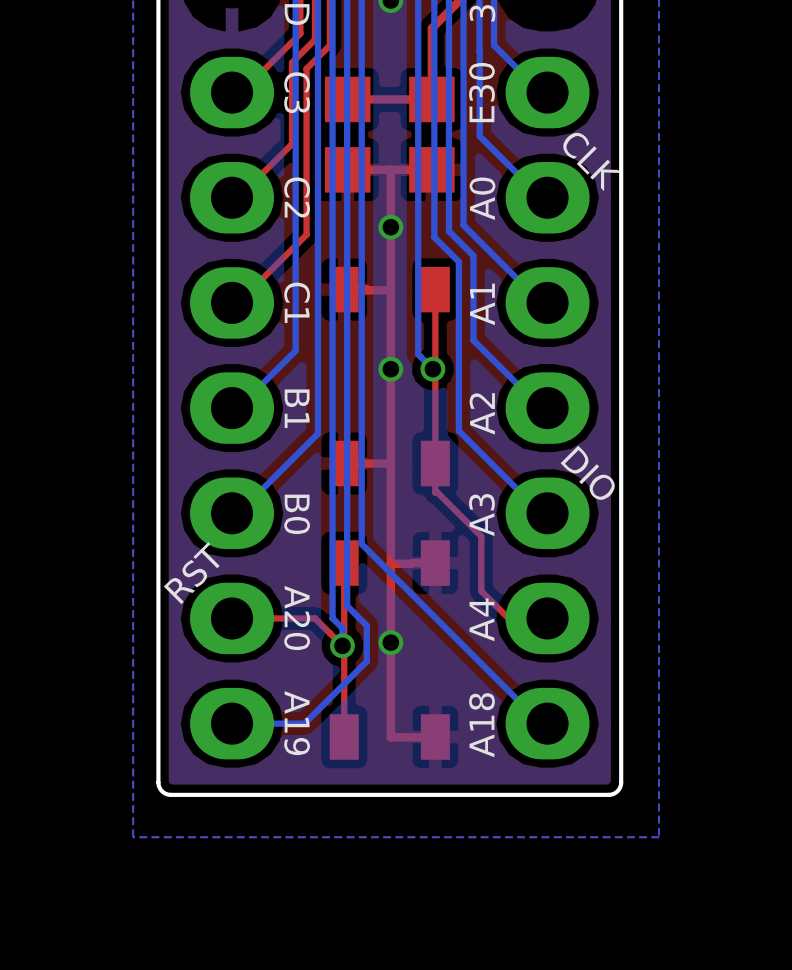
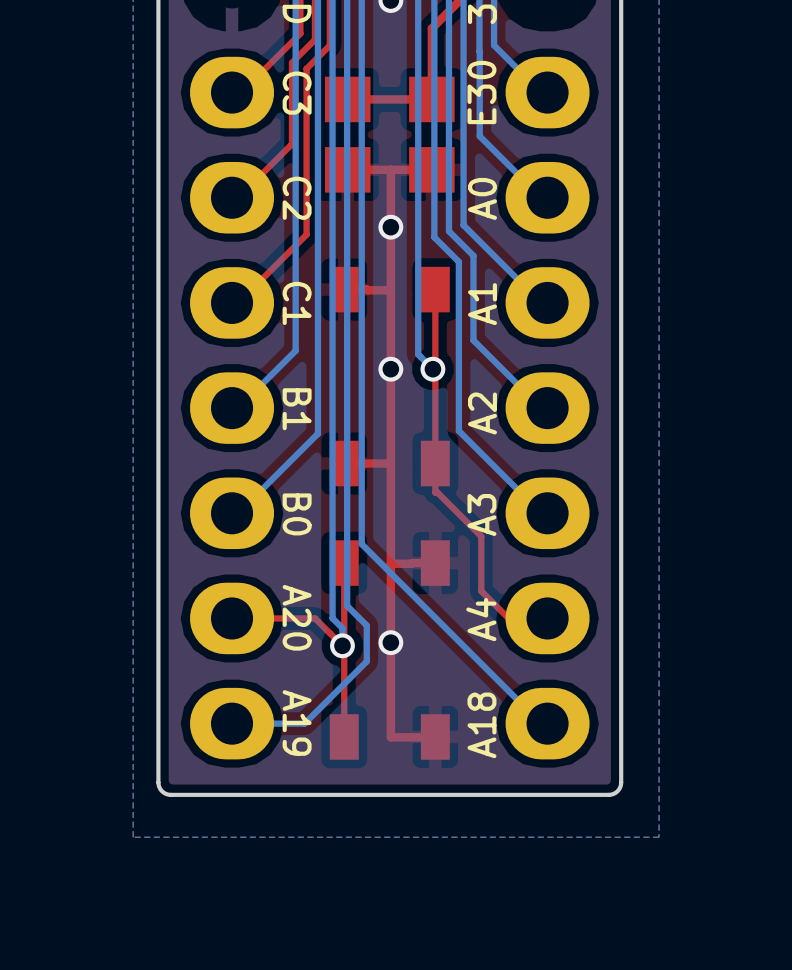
text: CLK (592, 161) -> none
text: DIO (587, 472) -> none
text: RST (191, 573) -> none

